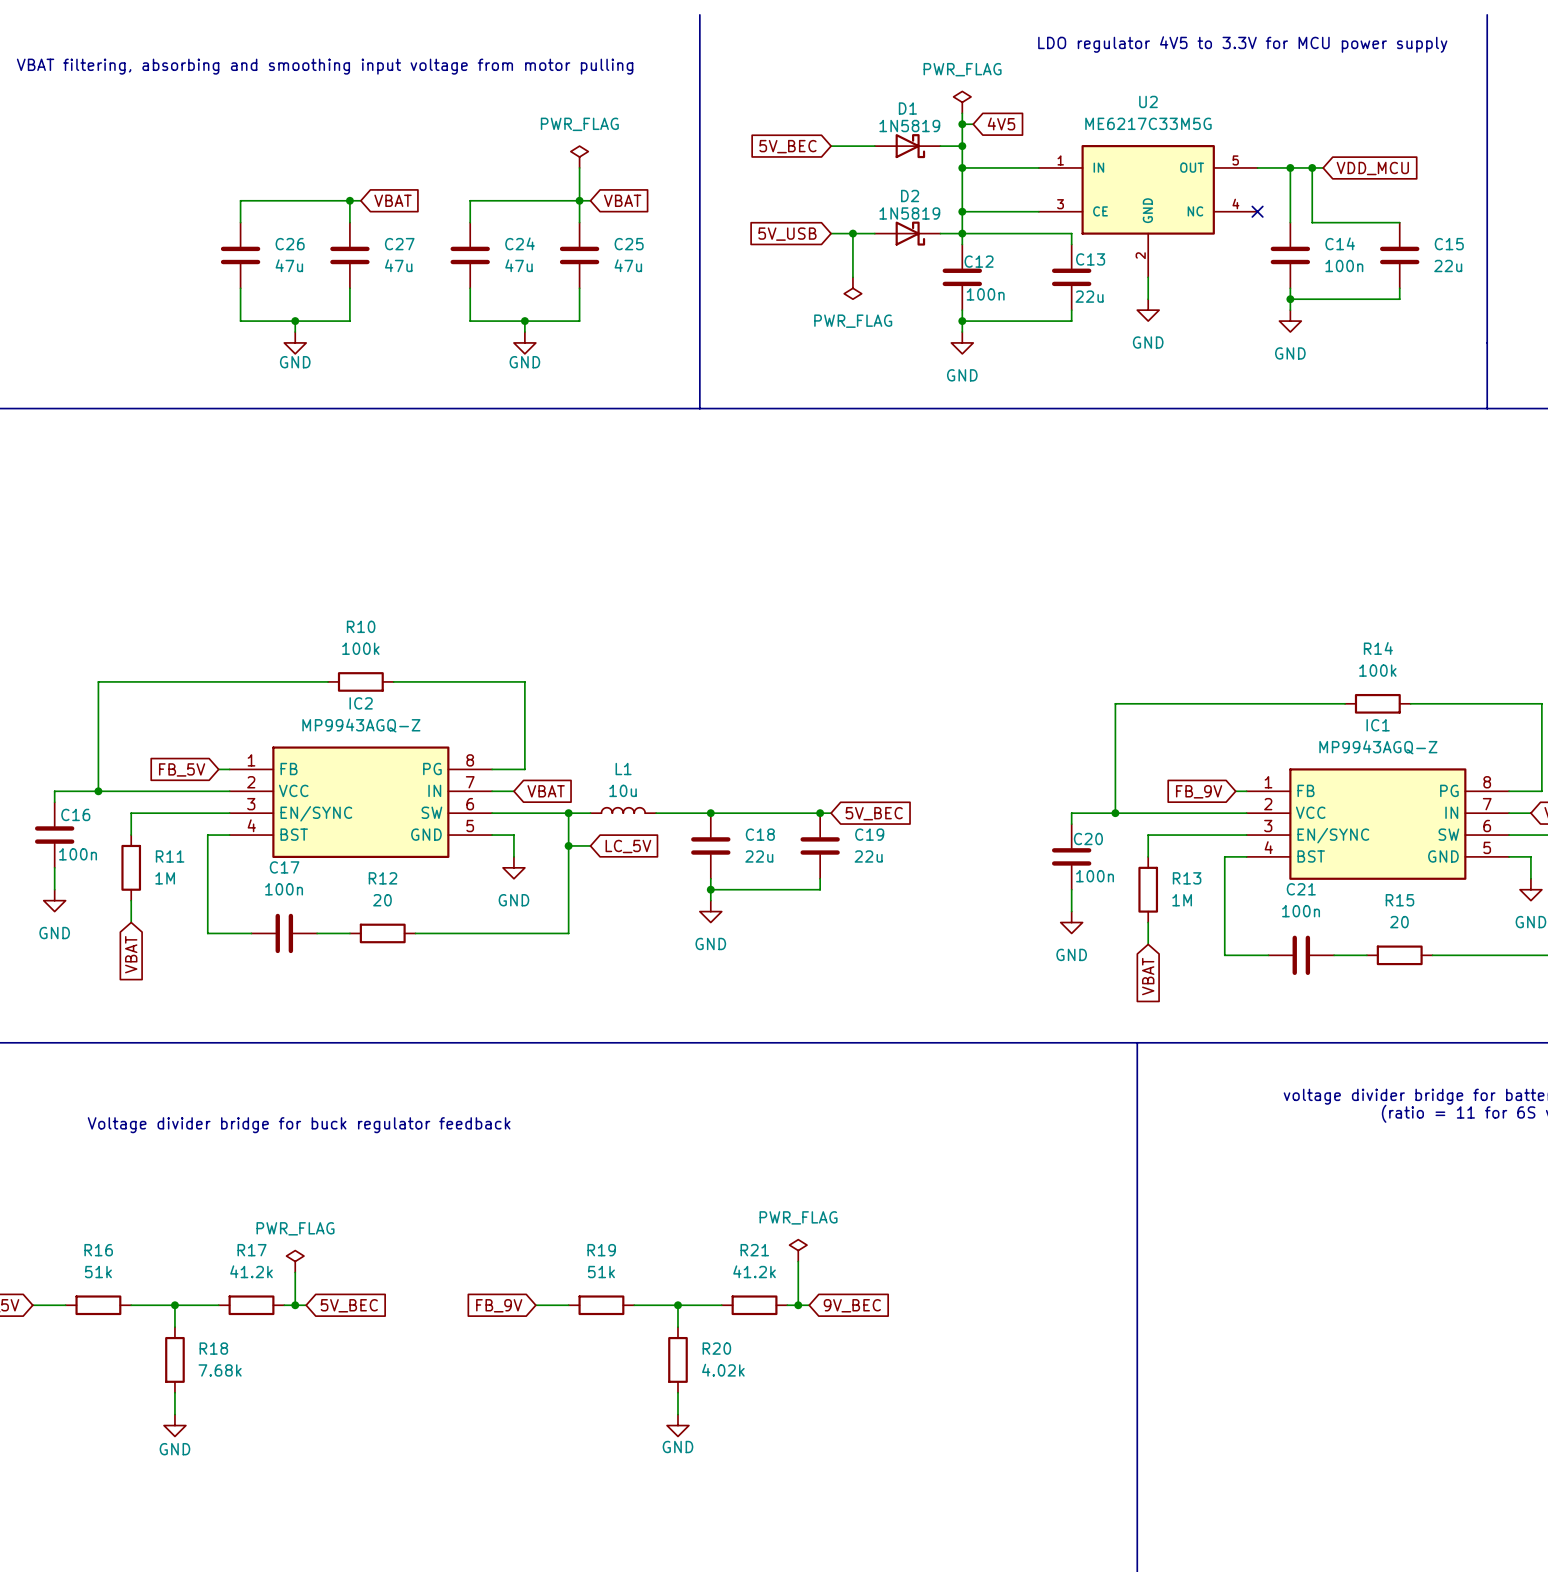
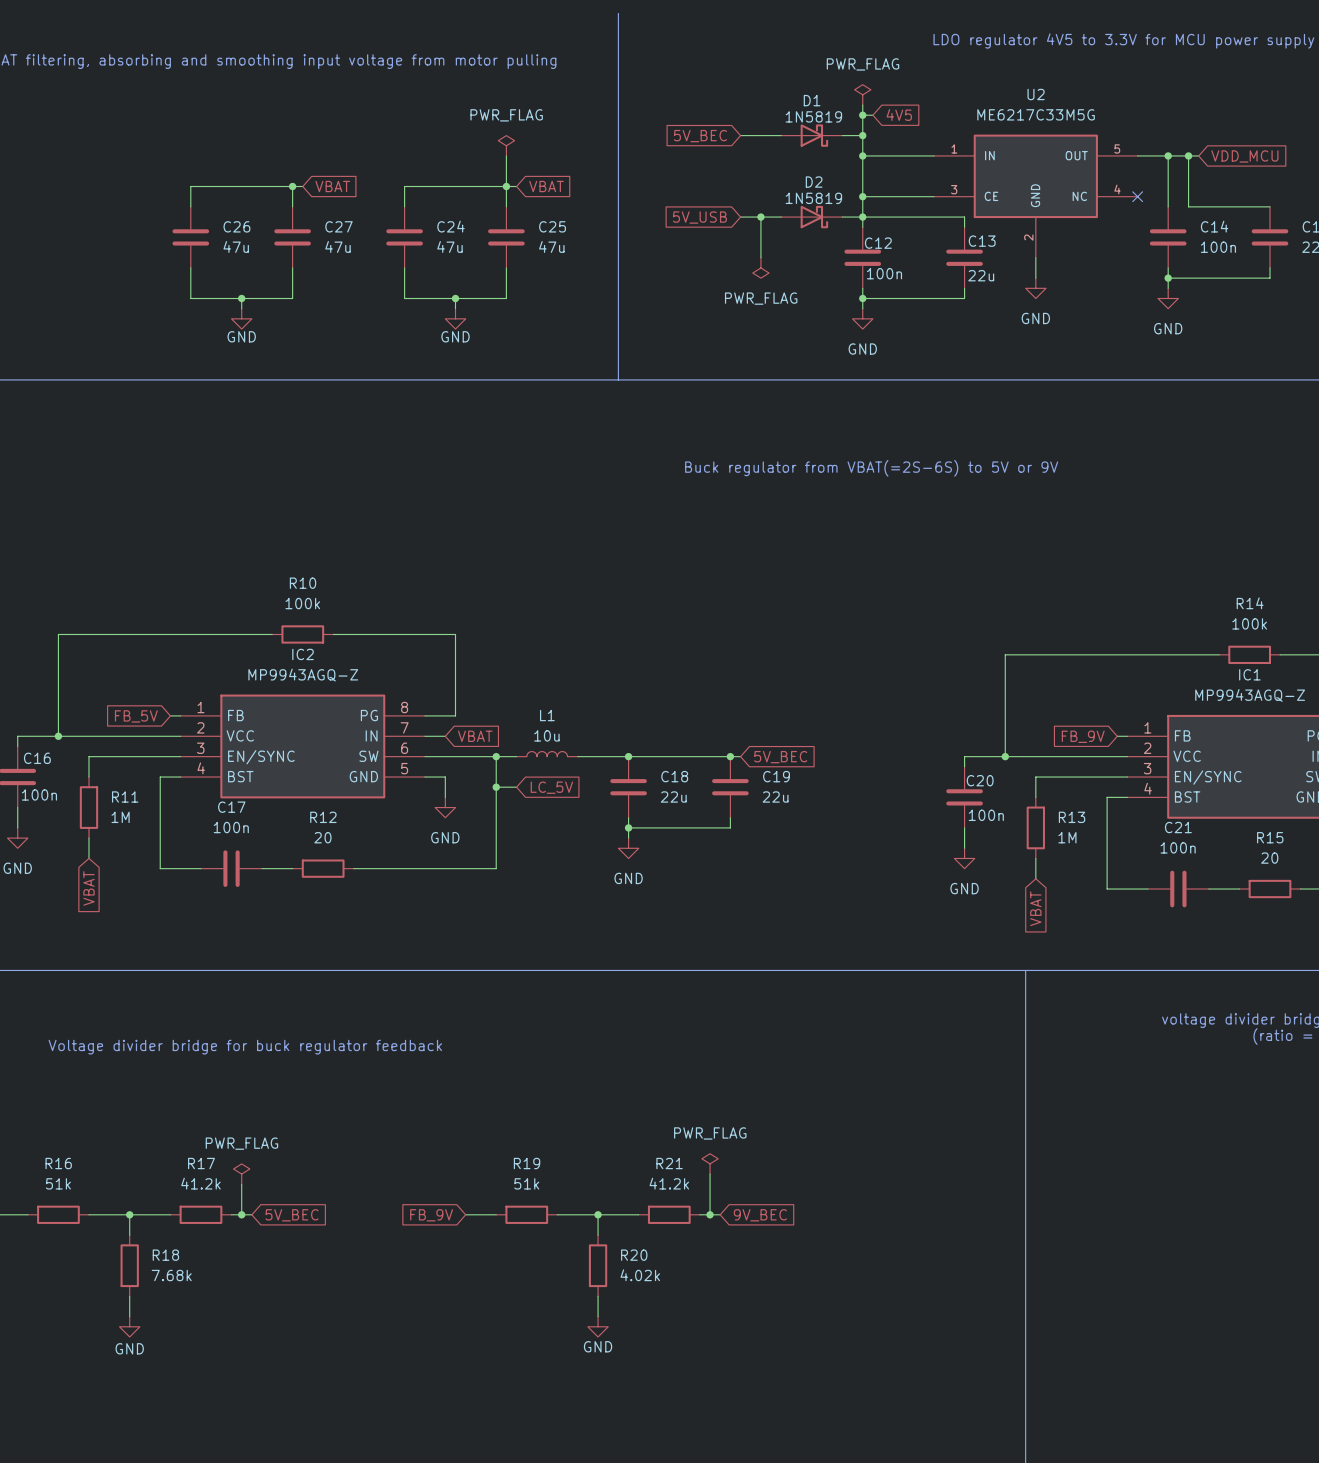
text: none -> Buck regulator from VBAT(=2S-6S) to 5V or 9V (871, 468)

